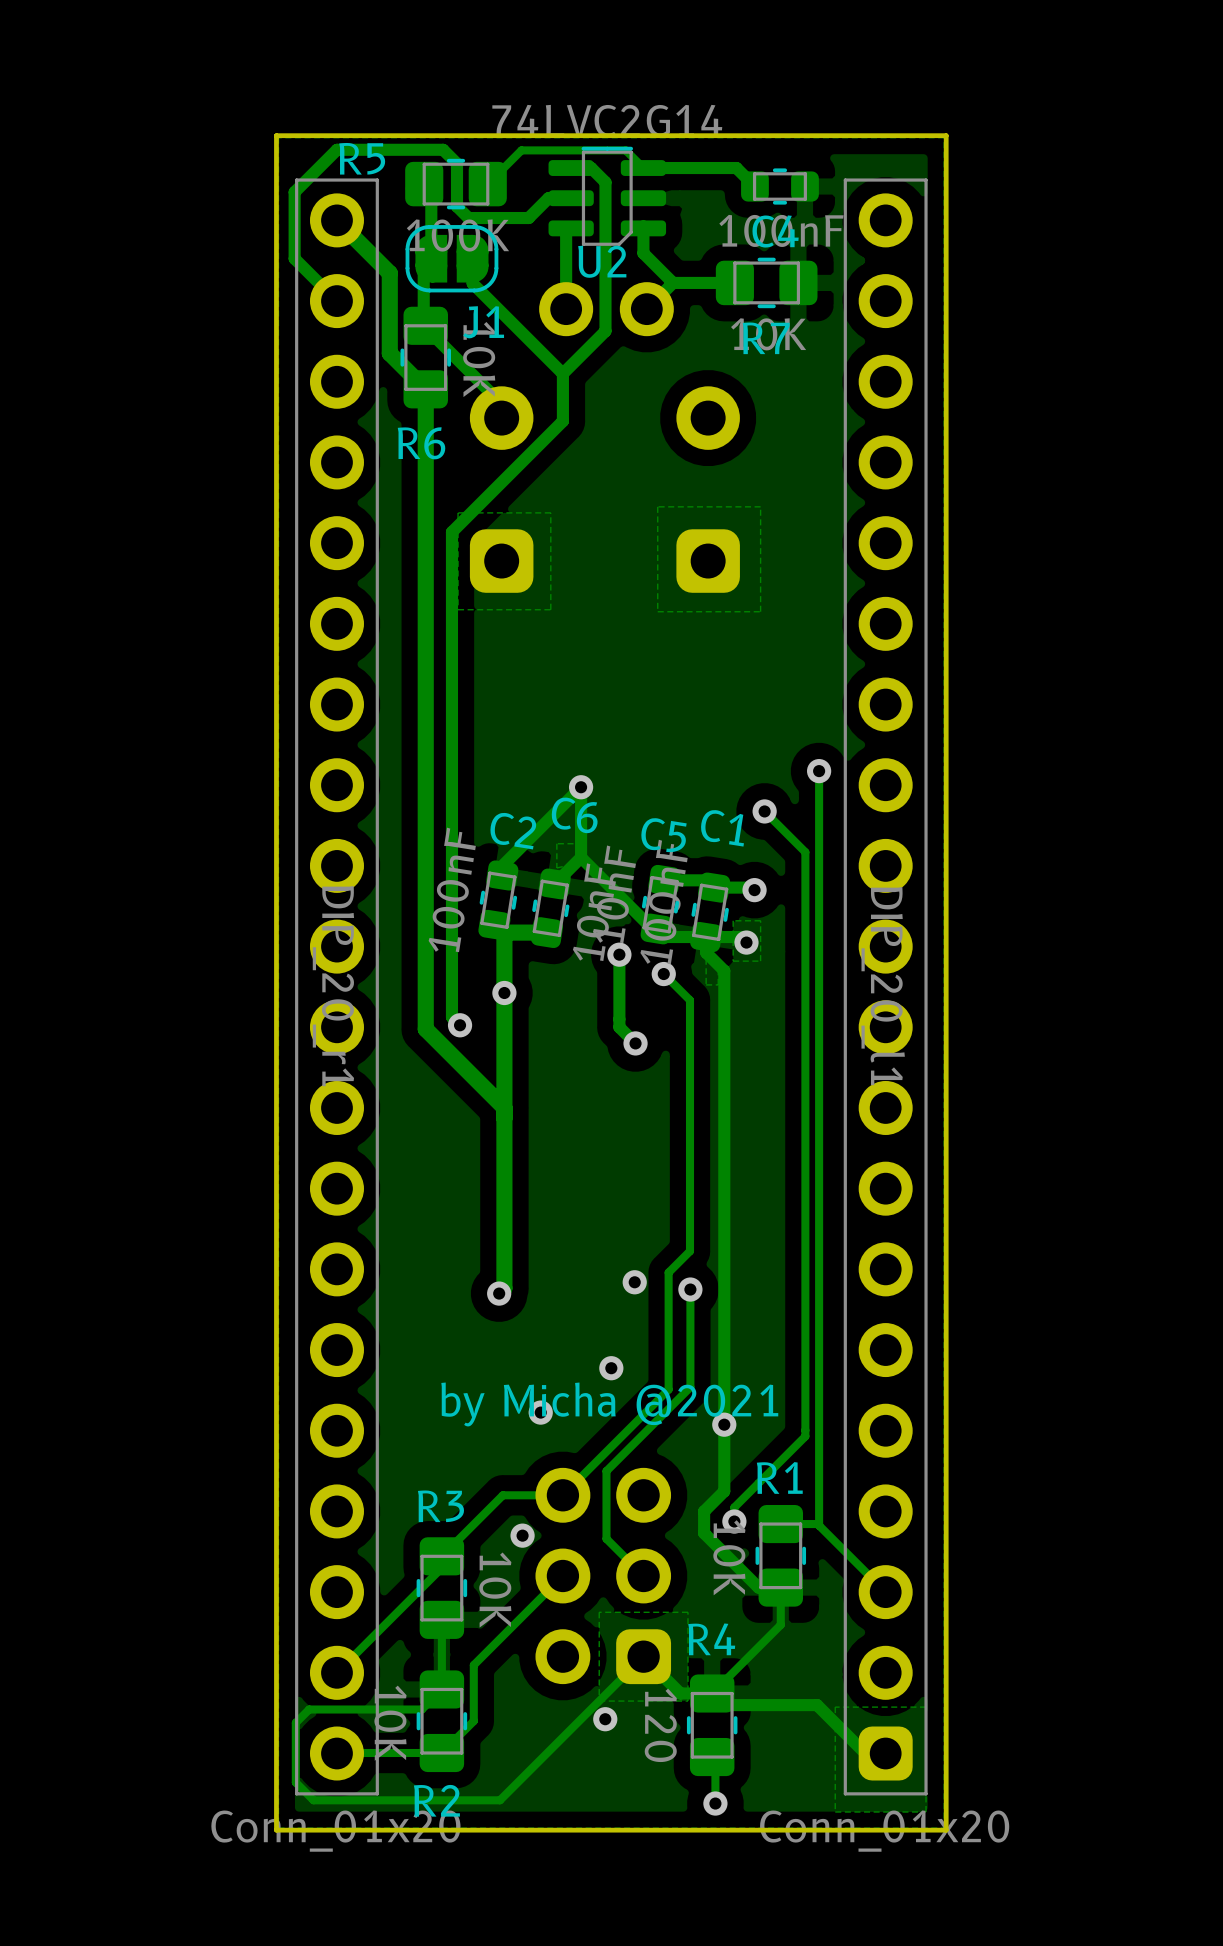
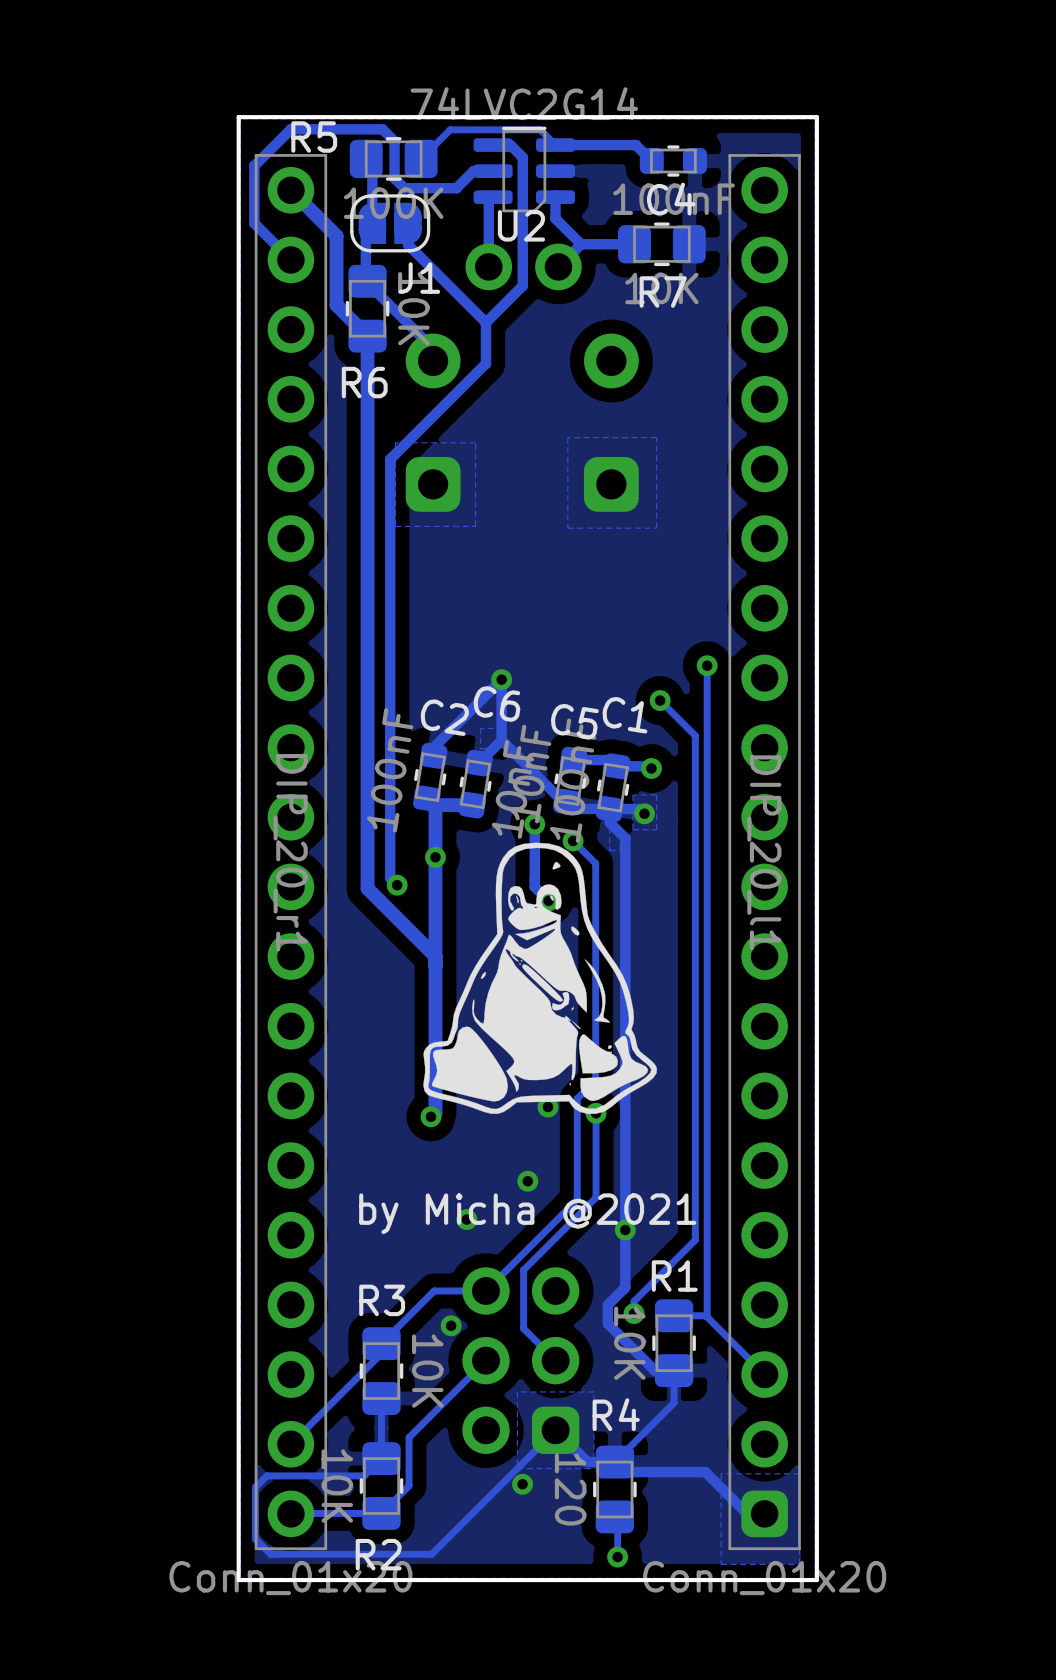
drawing: none -> [423, 842, 657, 1114]

